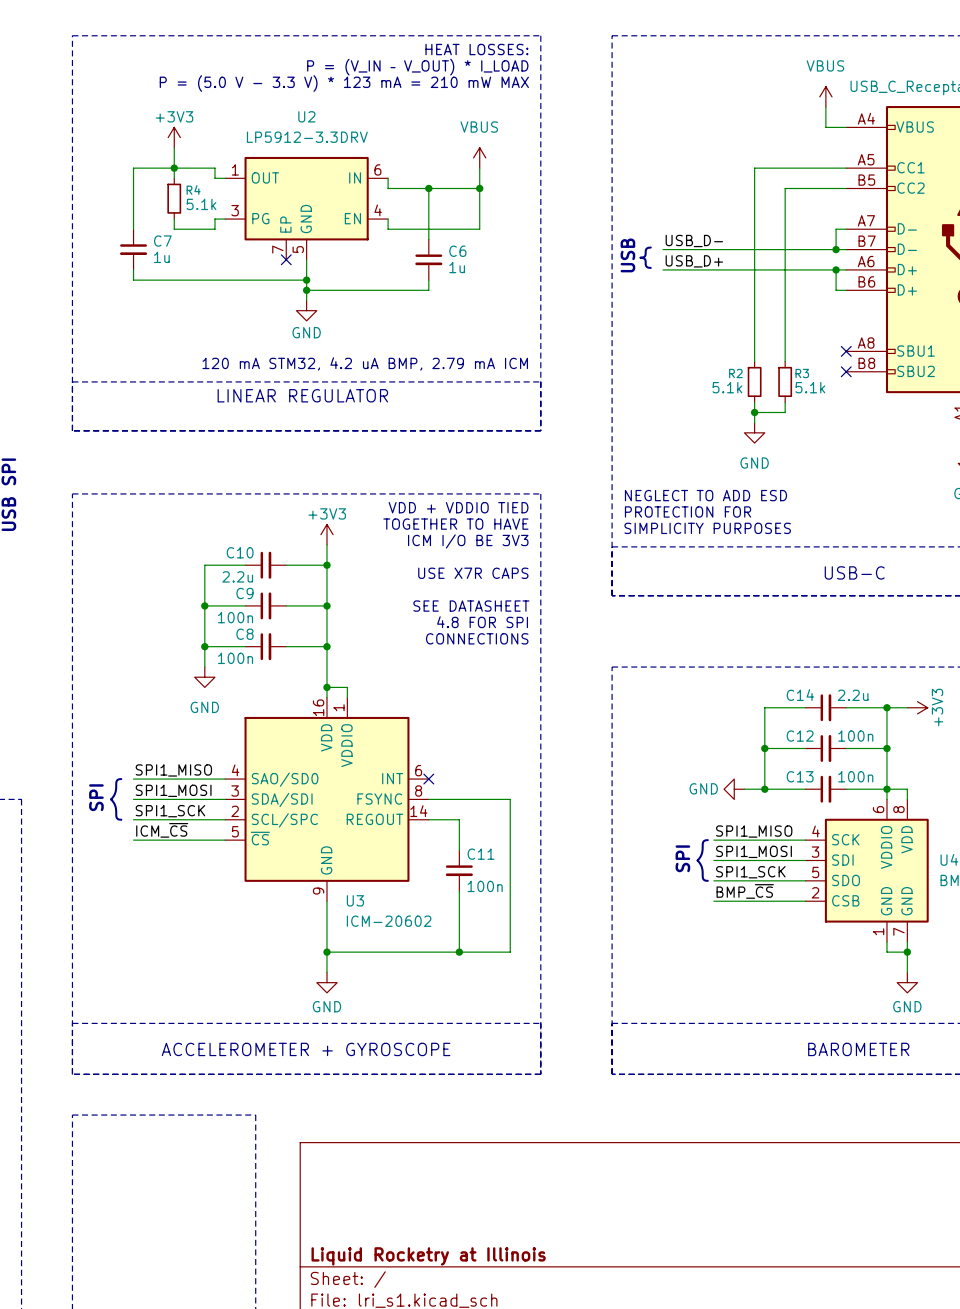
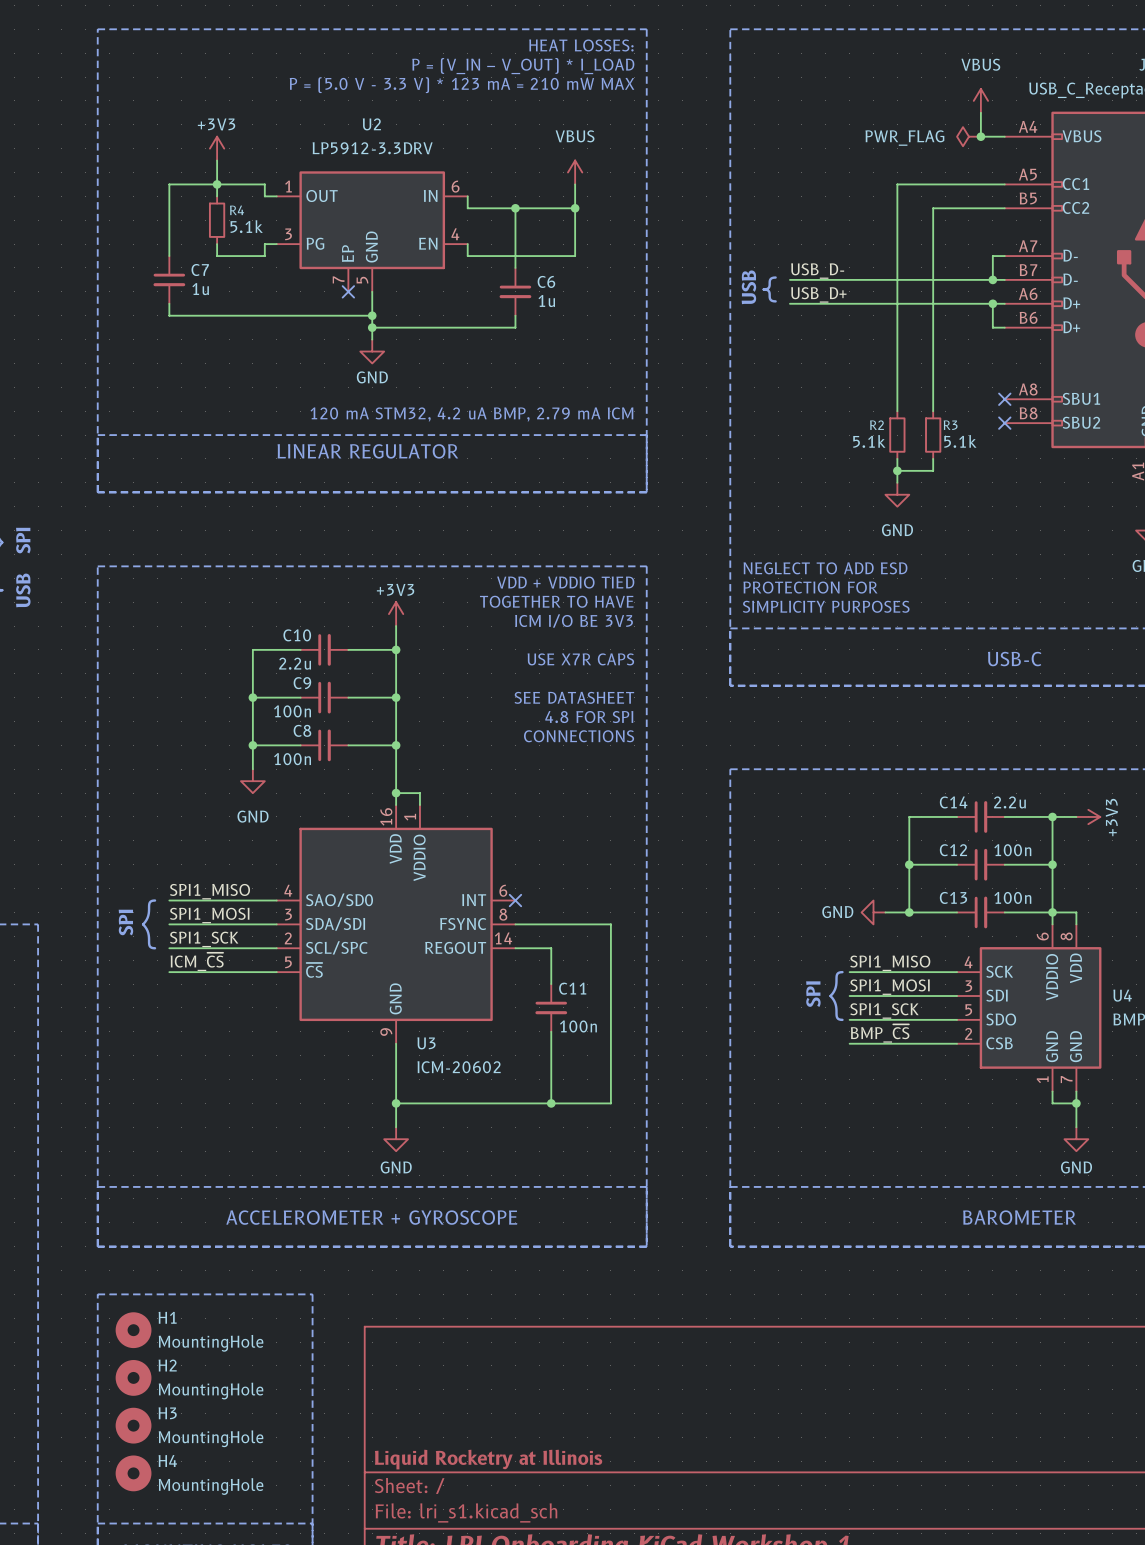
power symbol: none -> PWR_FLAG (968, 136)
junction: none -> (980, 136)
H1: none -> MountingHole (133, 1330)
H2: none -> MountingHole (133, 1377)
H3: none -> MountingHole (133, 1425)
H4: none -> MountingHole (133, 1473)

